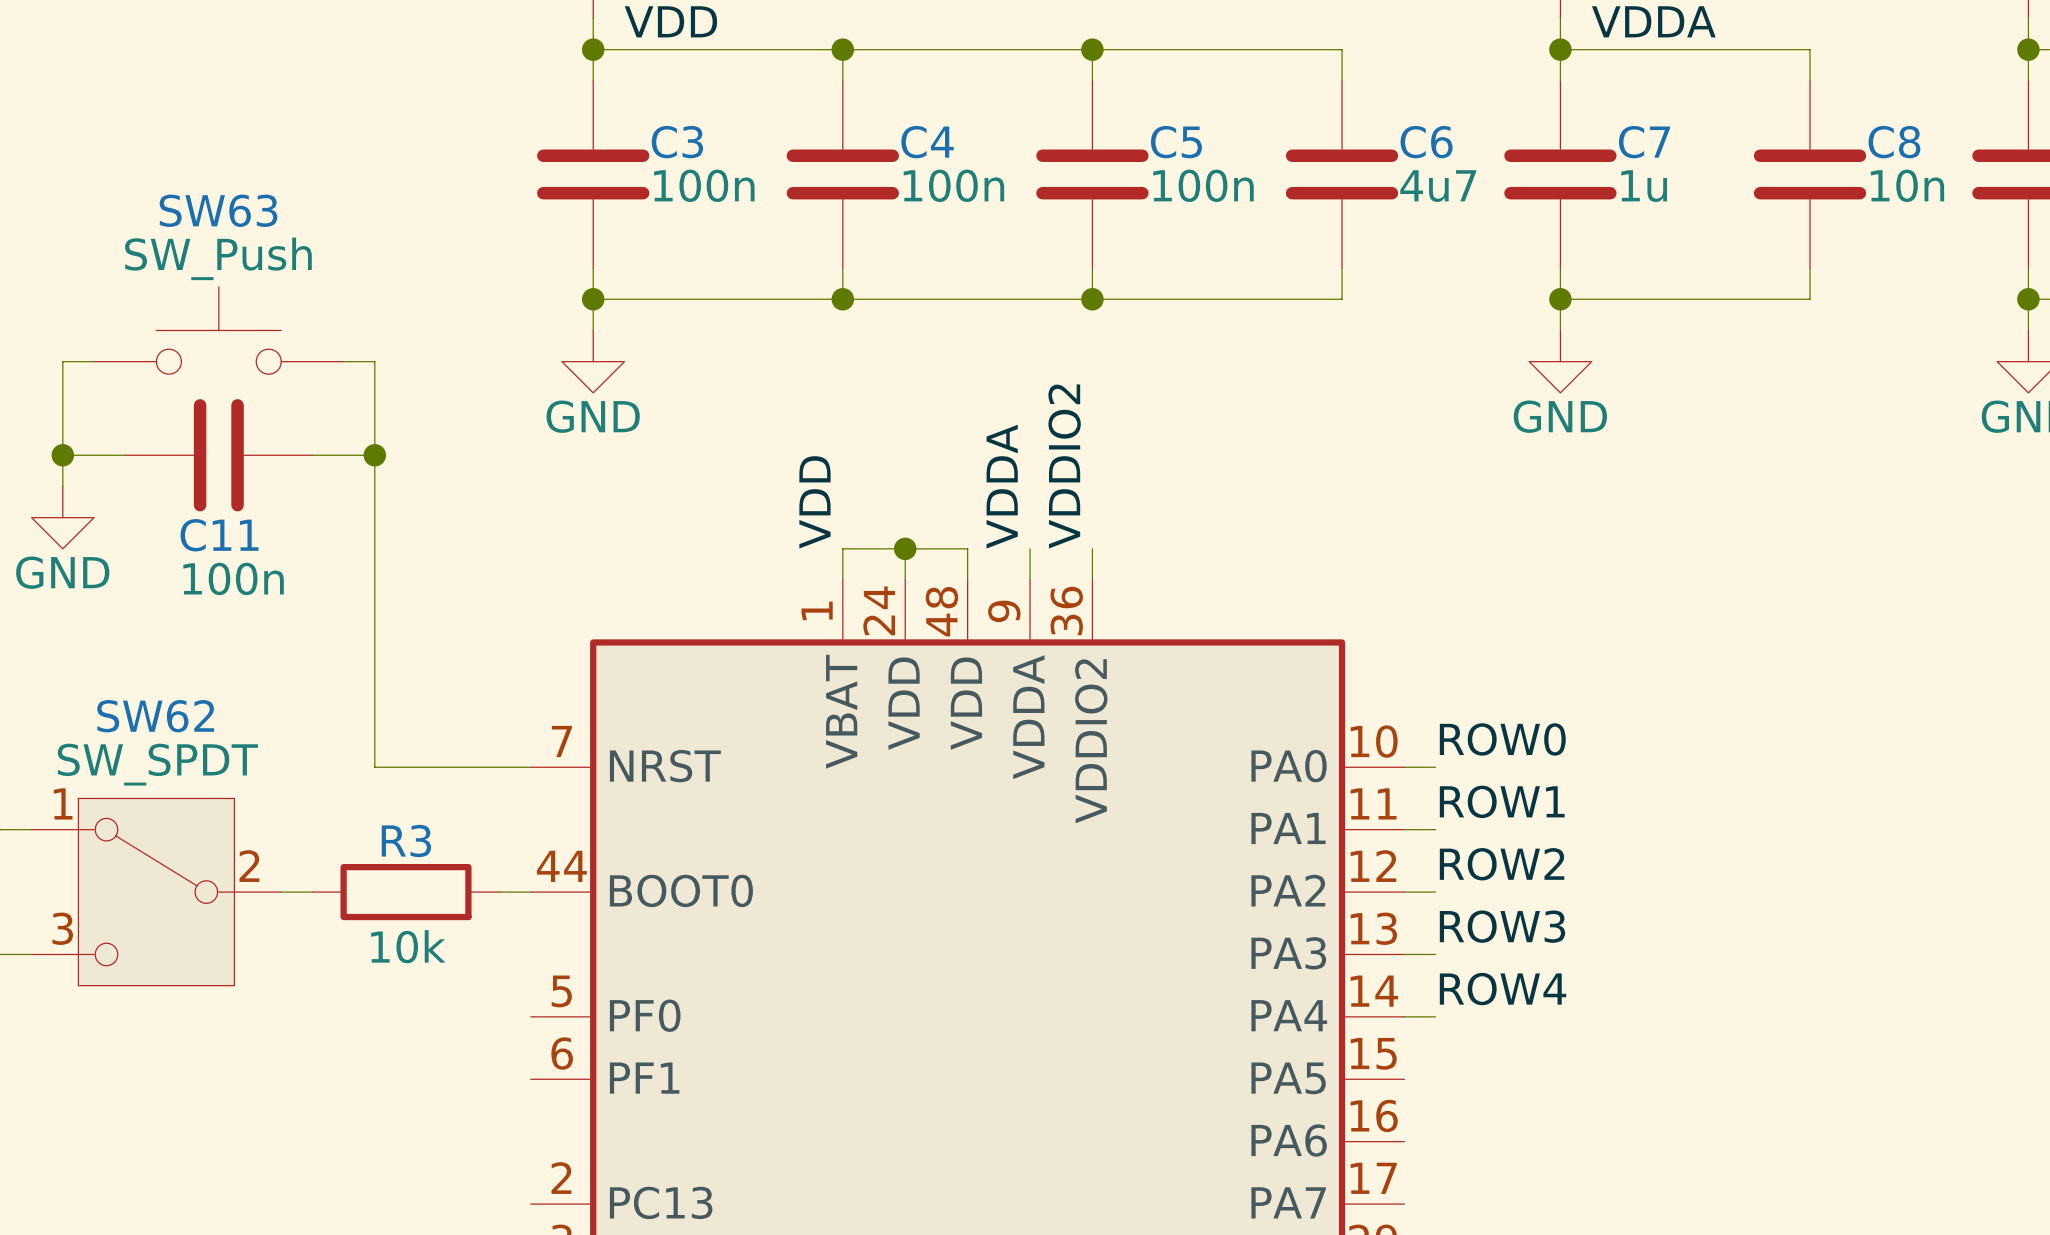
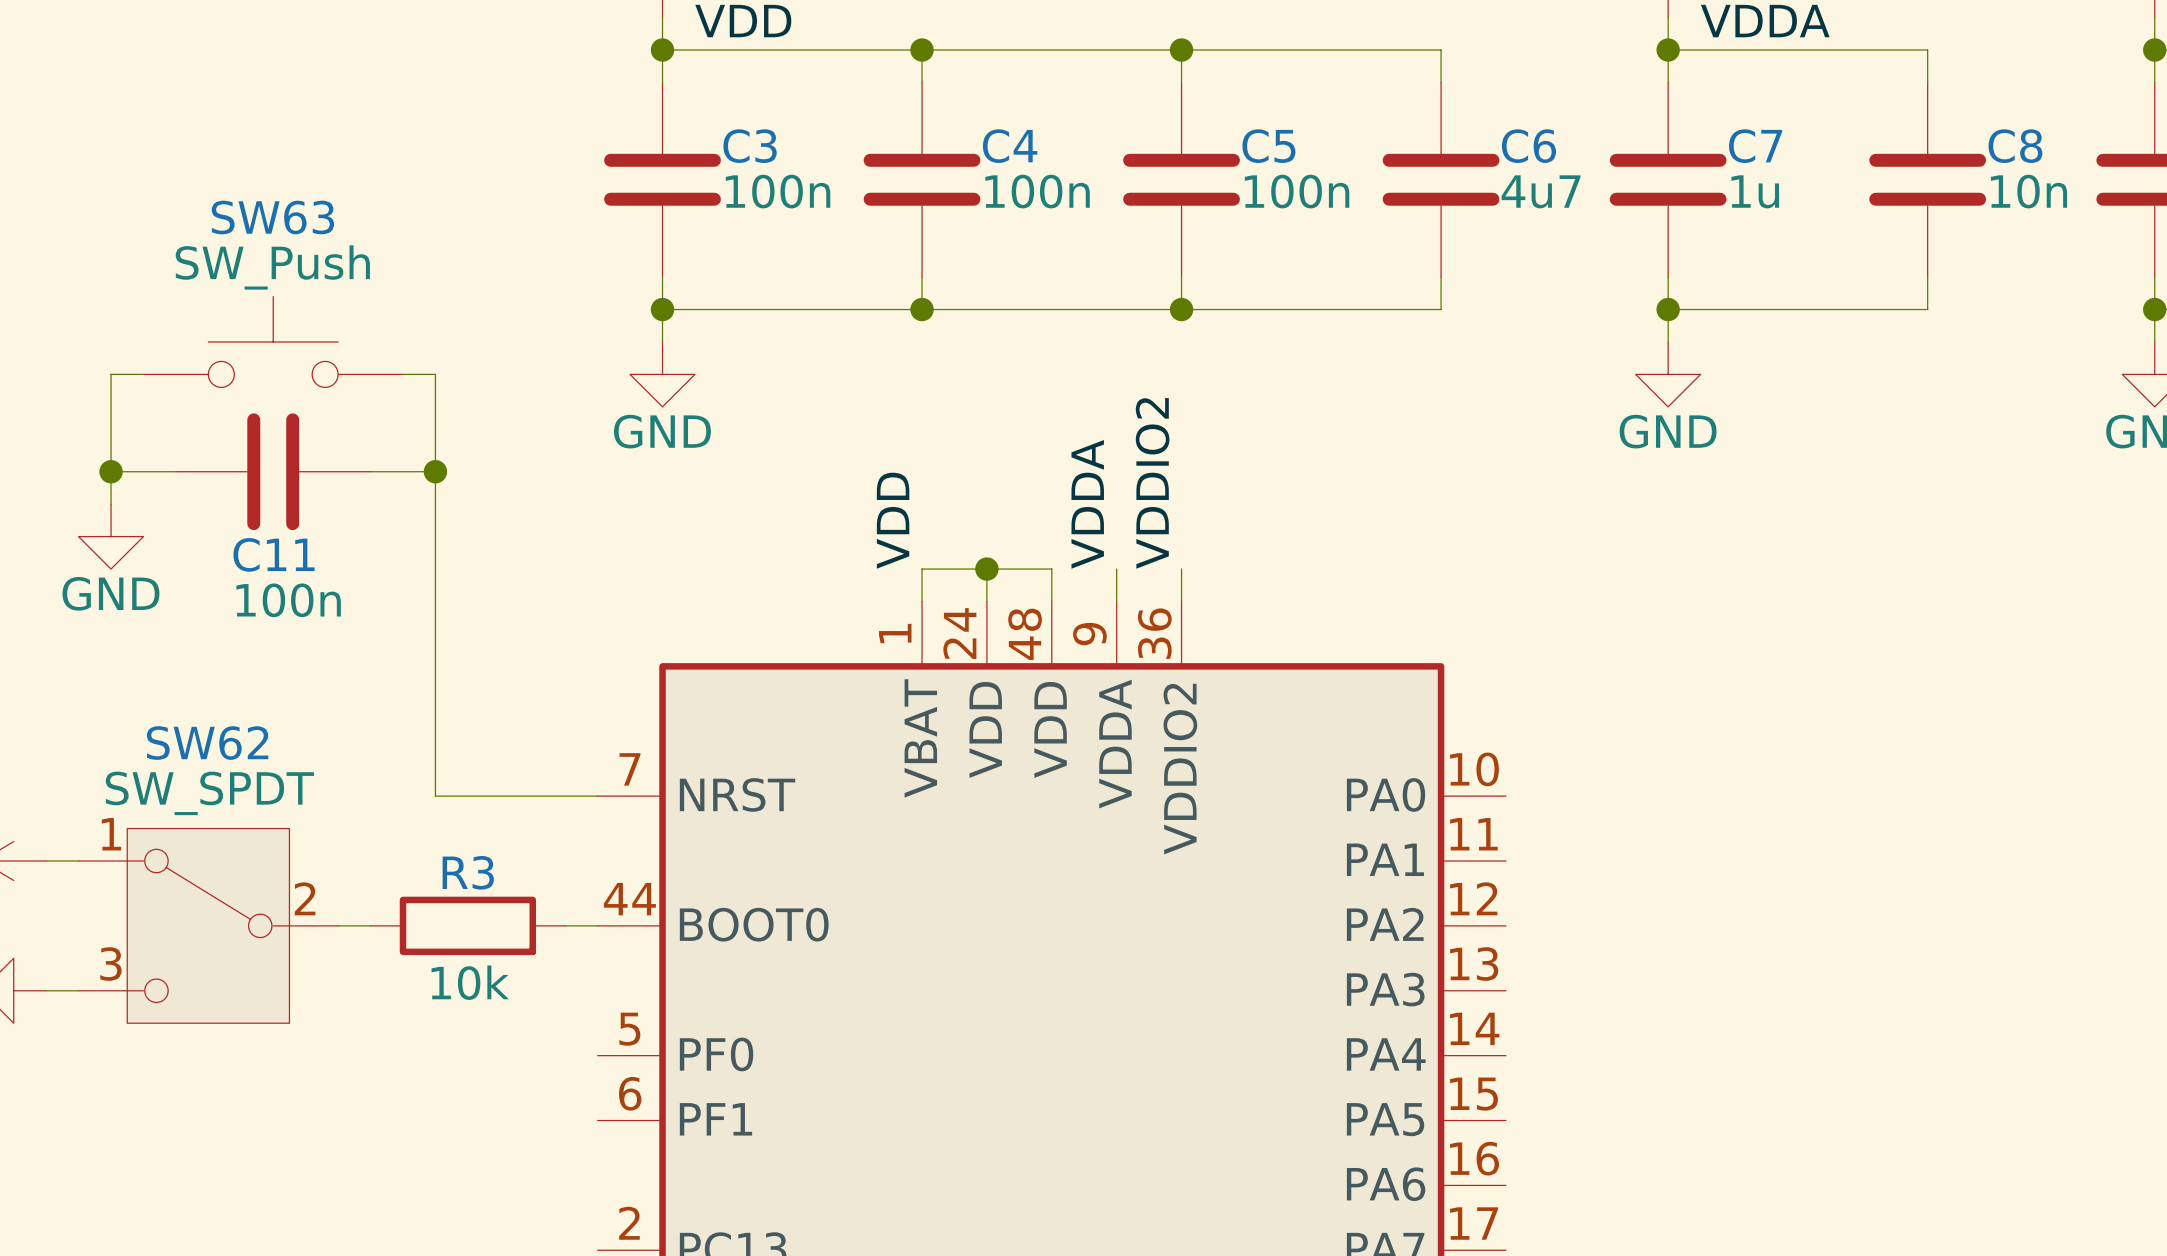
label: ROW0 (1502, 739) -> none
wire: (1404, 767) (1435, 767) -> none
label: ROW1 (1502, 801) -> none
wire: (1404, 829) (1435, 829) -> none
label: ROW2 (1502, 864) -> none
wire: (1404, 892) (1435, 892) -> none
label: ROW3 (1502, 926) -> none
wire: (1404, 954) (1435, 954) -> none
label: ROW4 (1503, 989) -> none
wire: (1404, 1016) (1435, 1016) -> none

